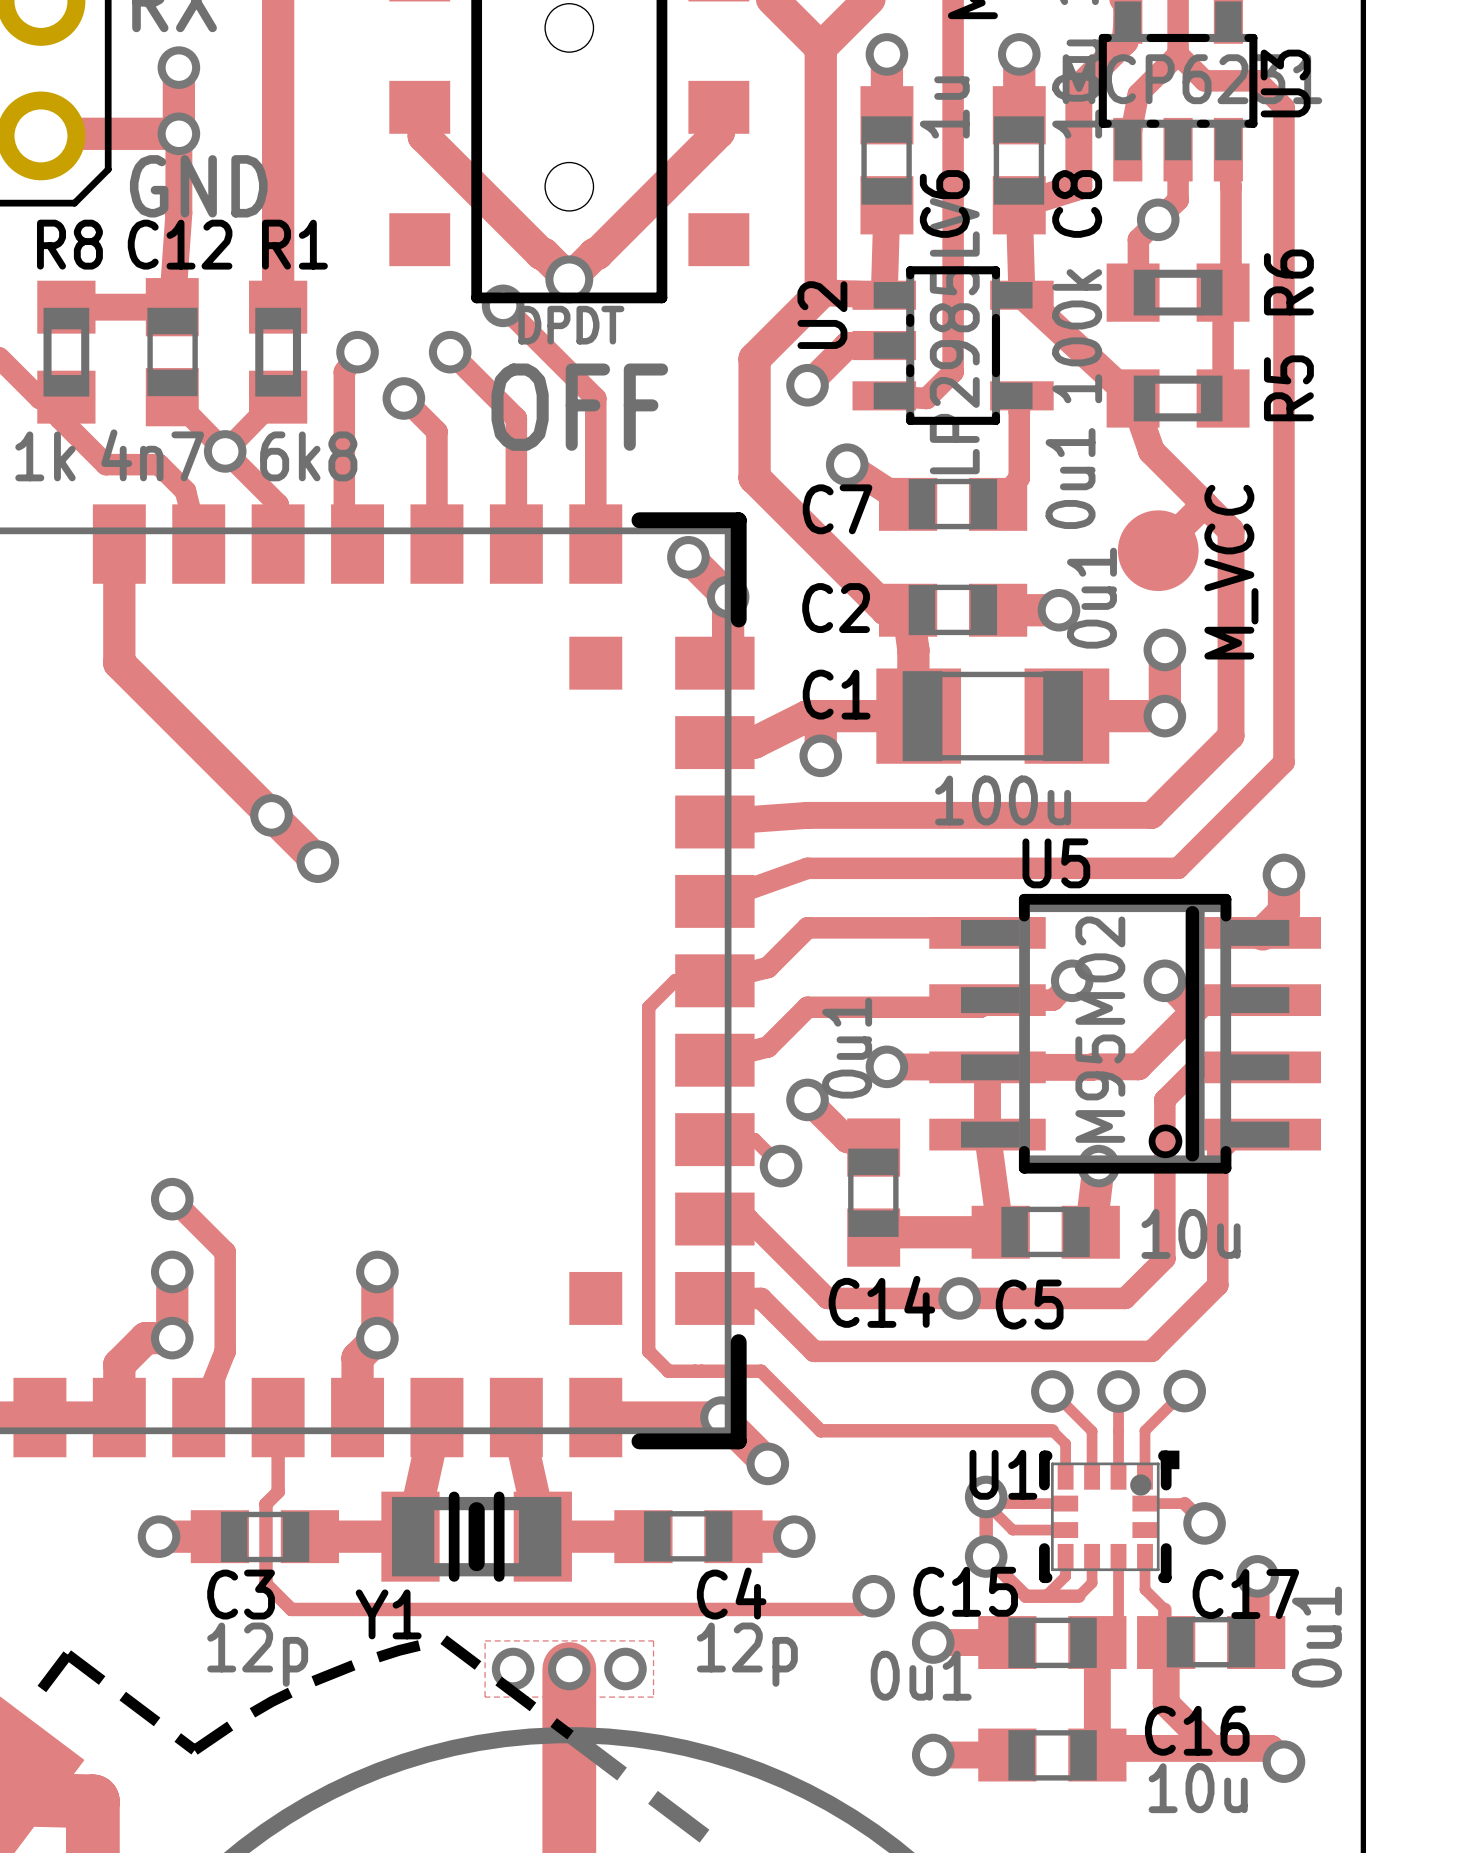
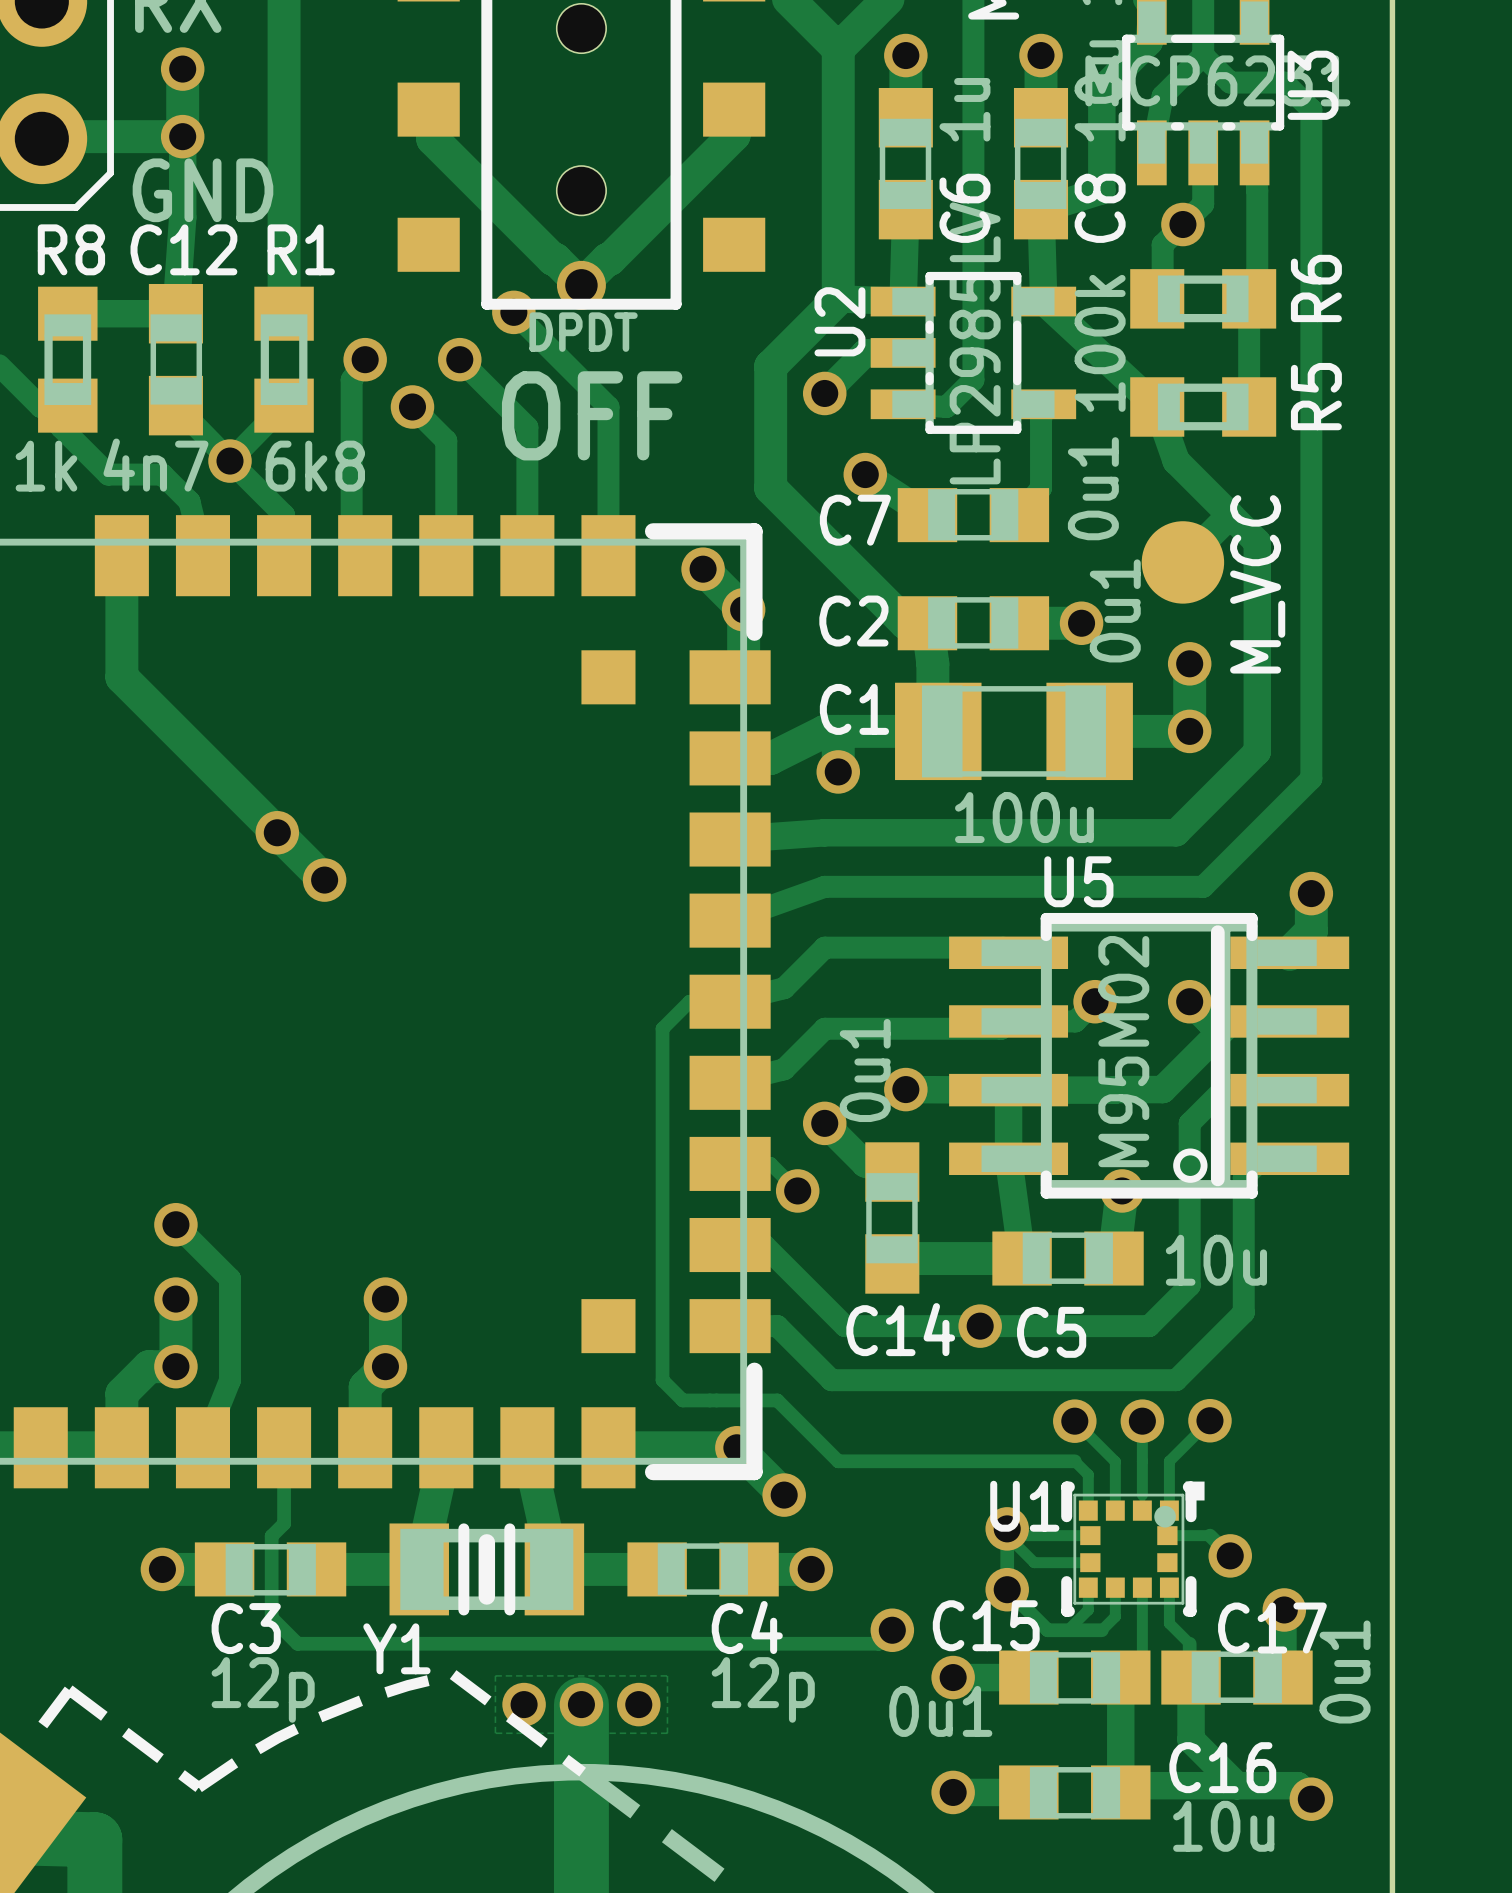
U1 footprint: [1039, 1450, 1180, 1584] -> [1061, 1481, 1205, 1617]

